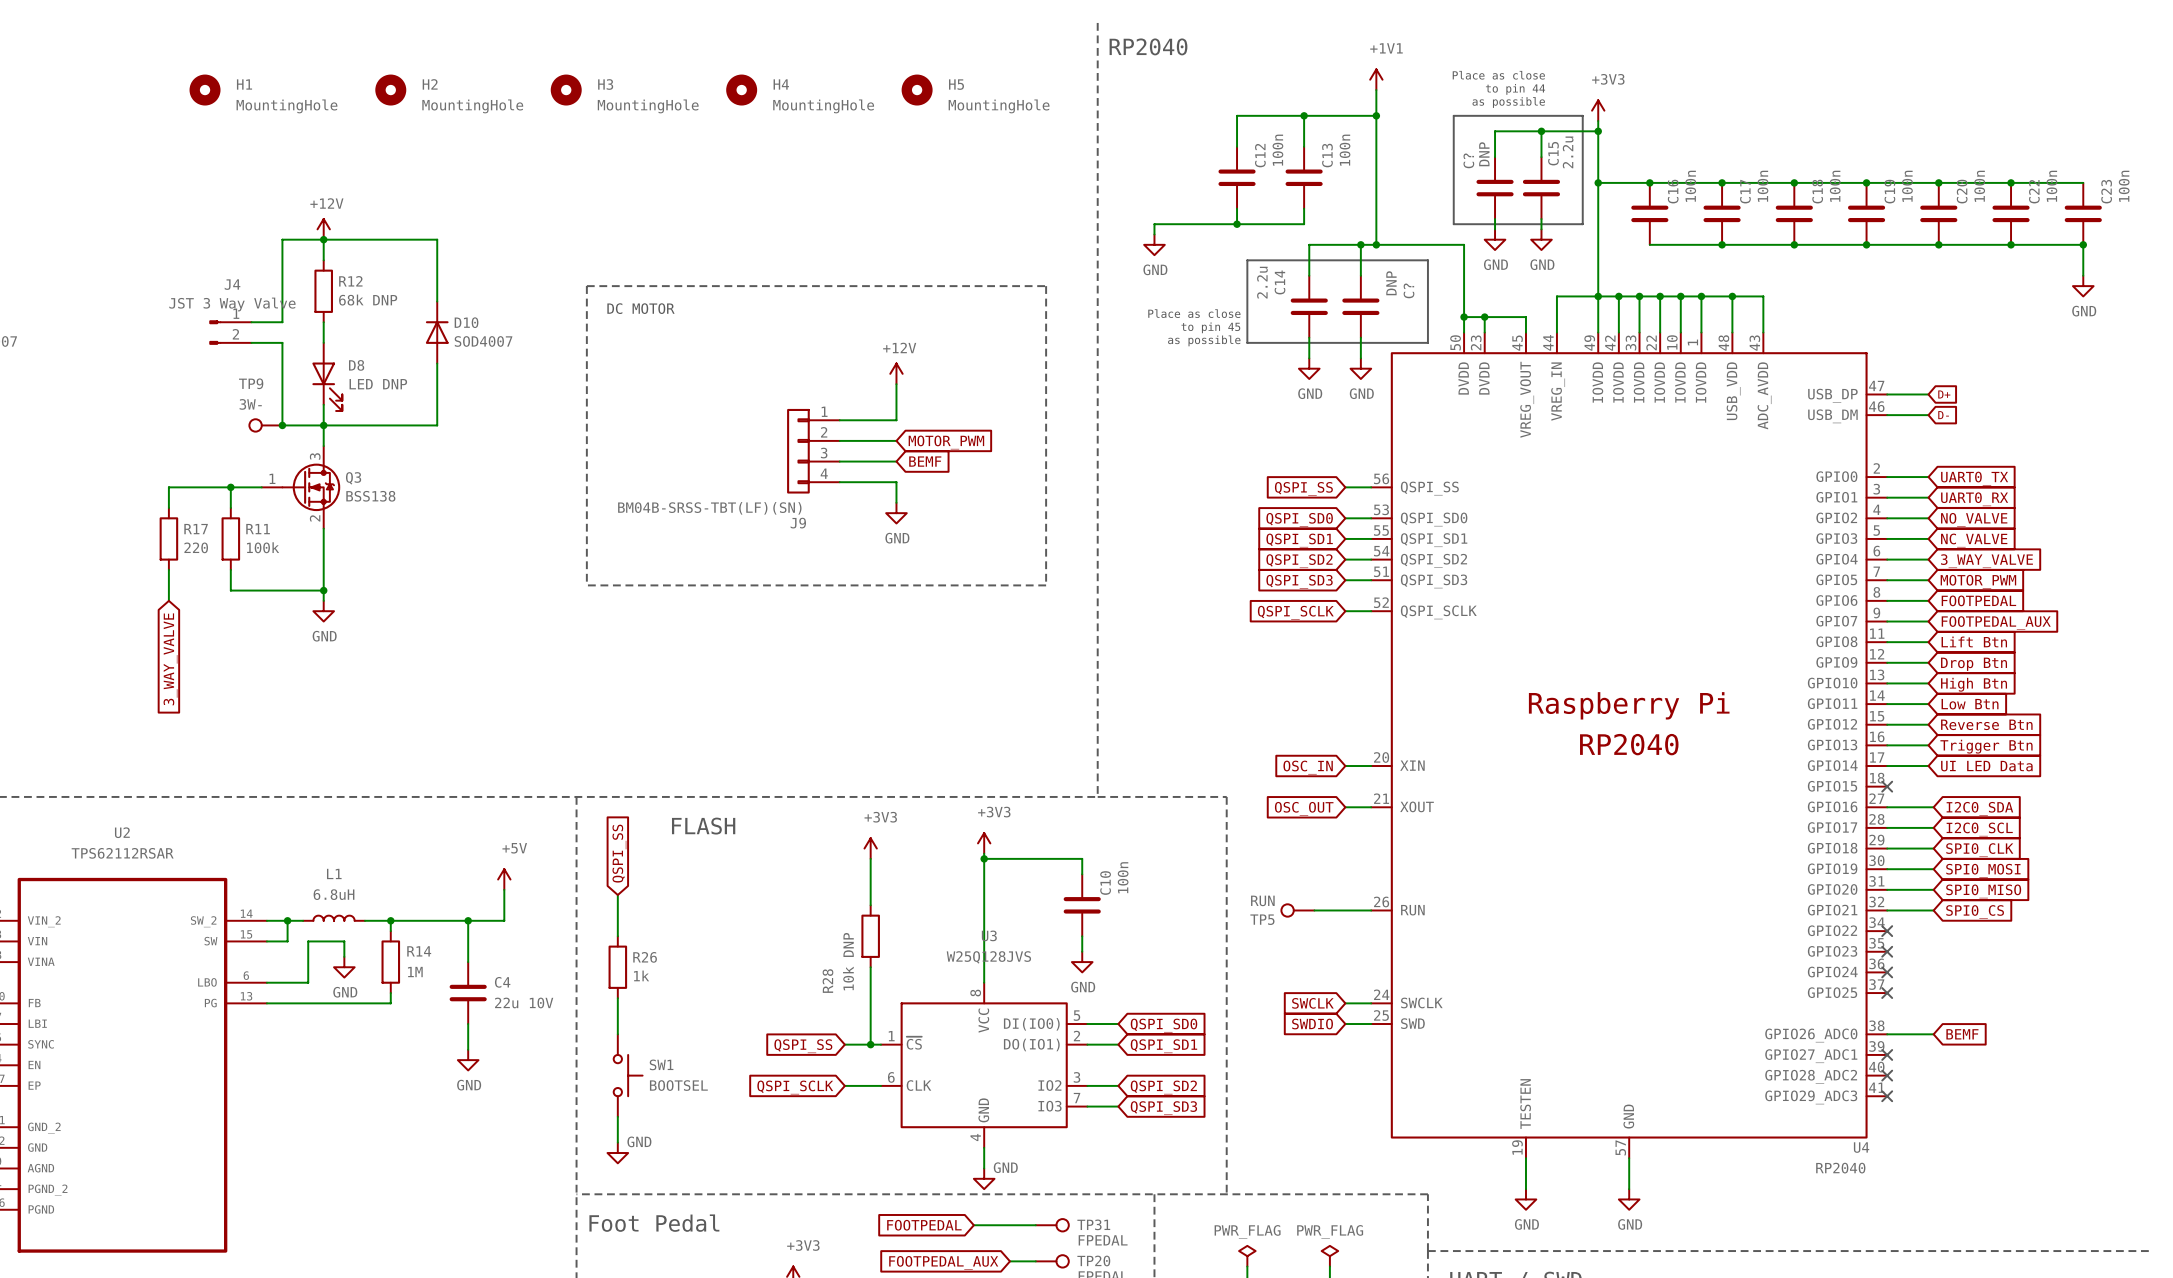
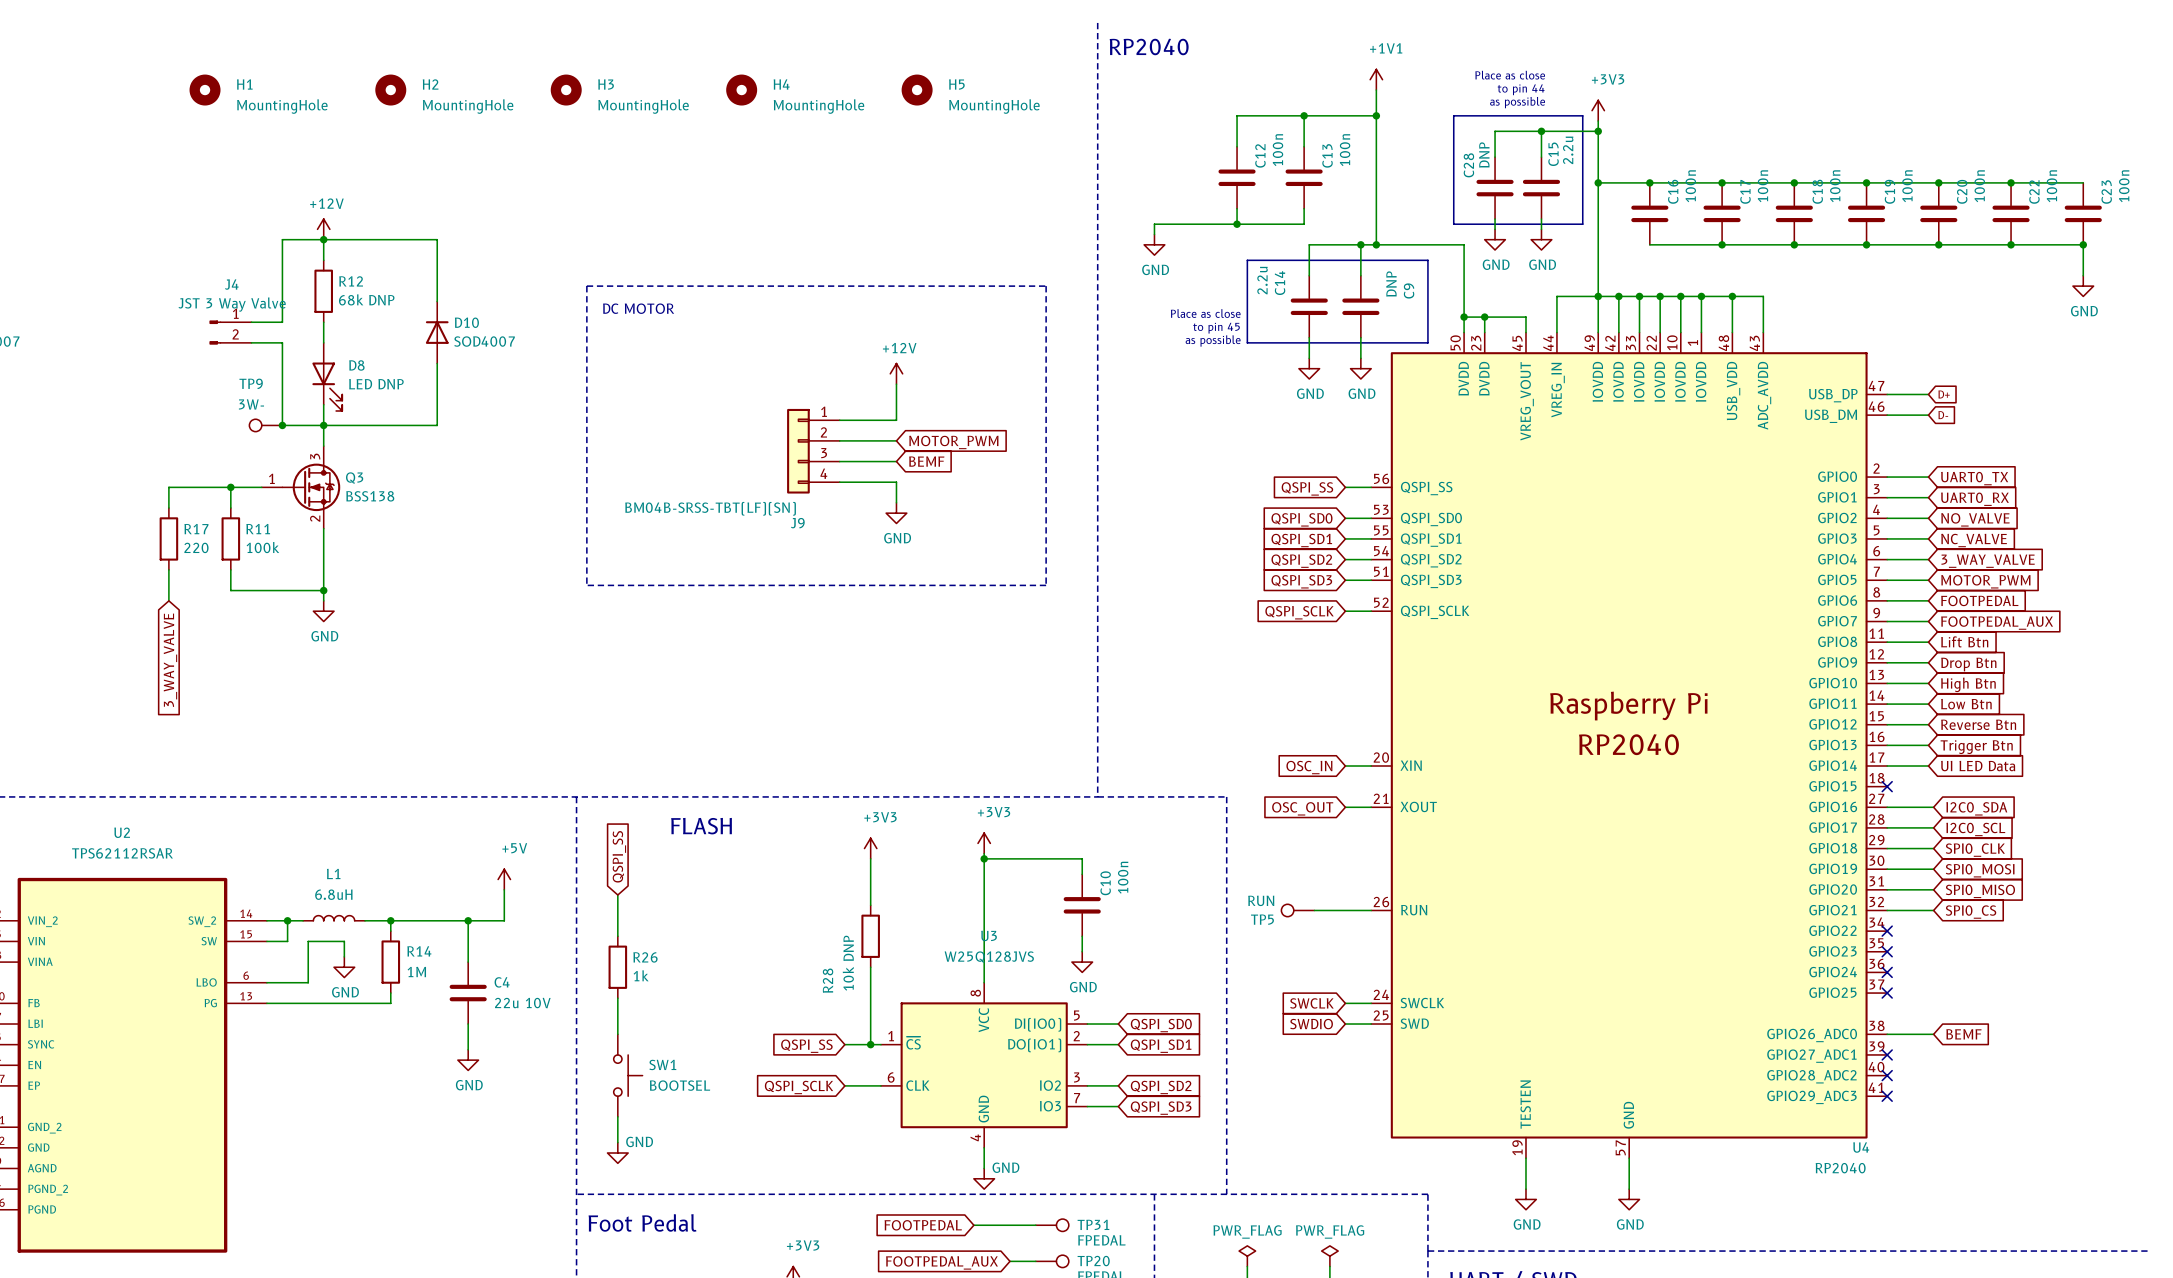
C? name: C? (1468, 160) -> C28 (1468, 165)
C? name: C? (1409, 290) -> C9 (1409, 290)

